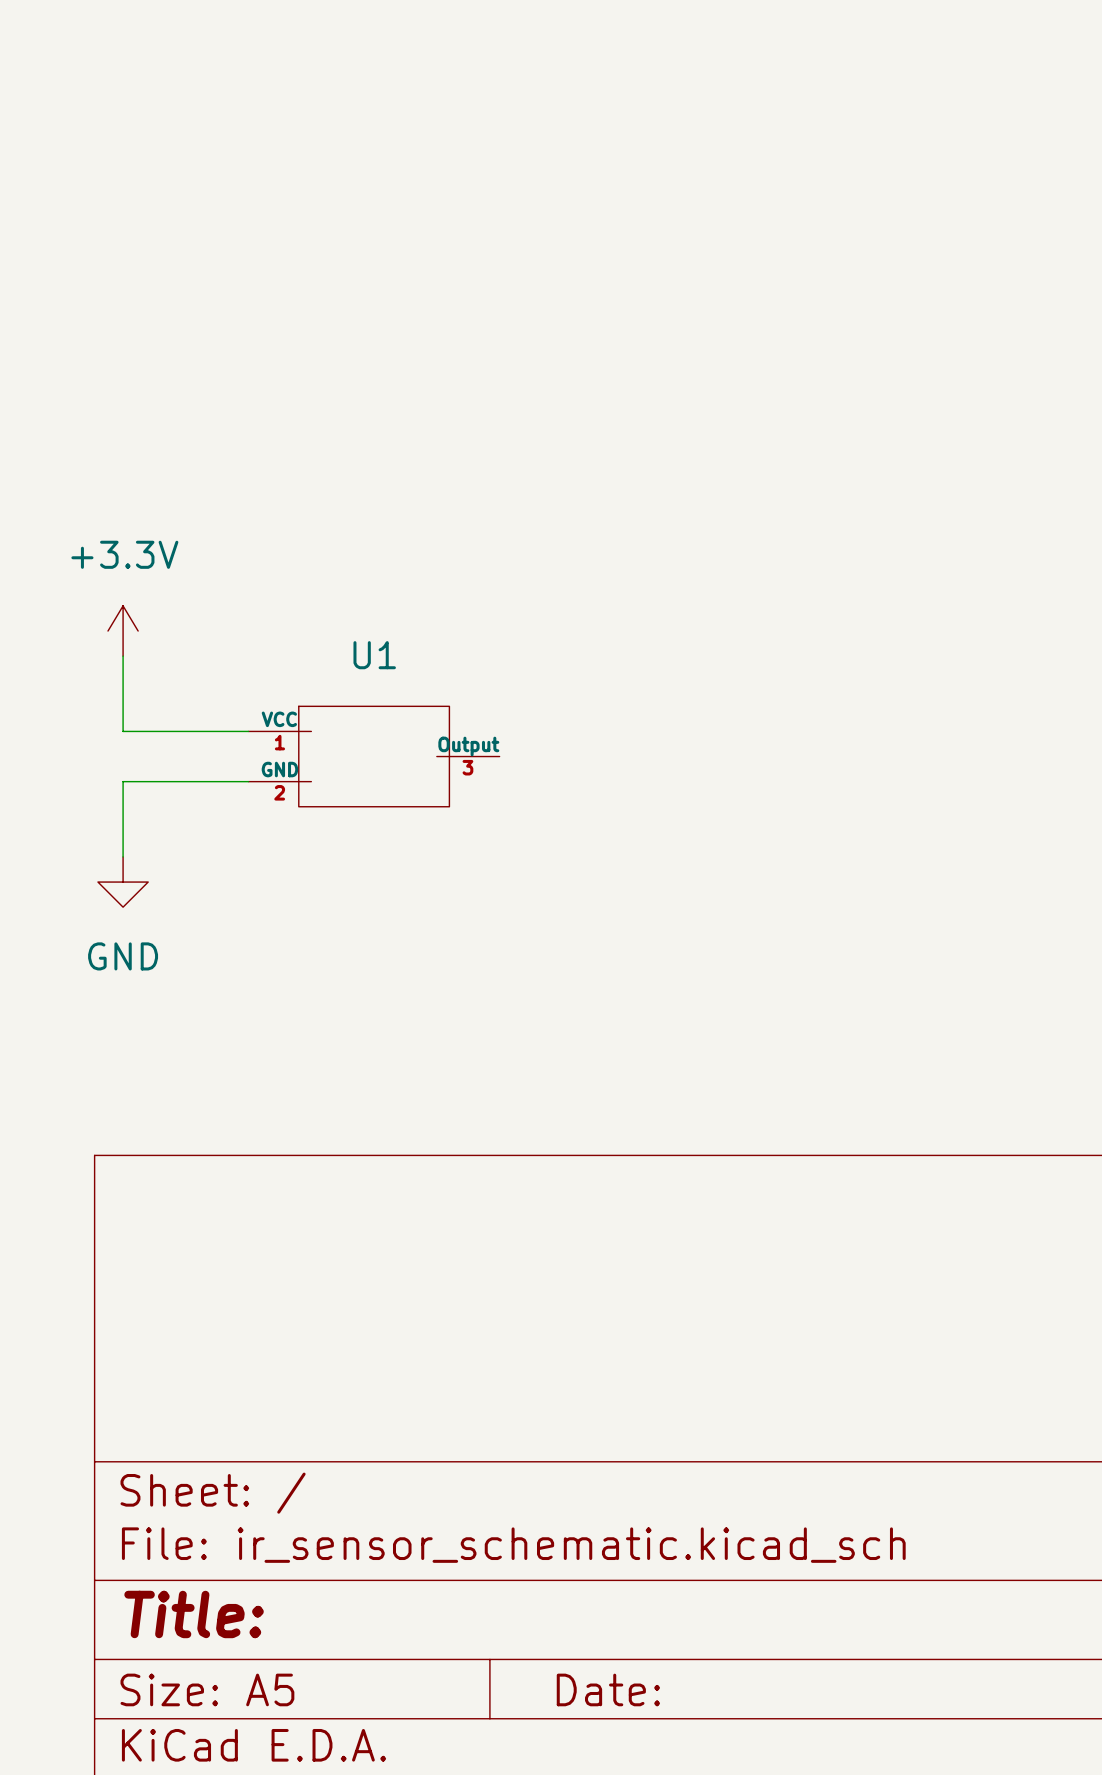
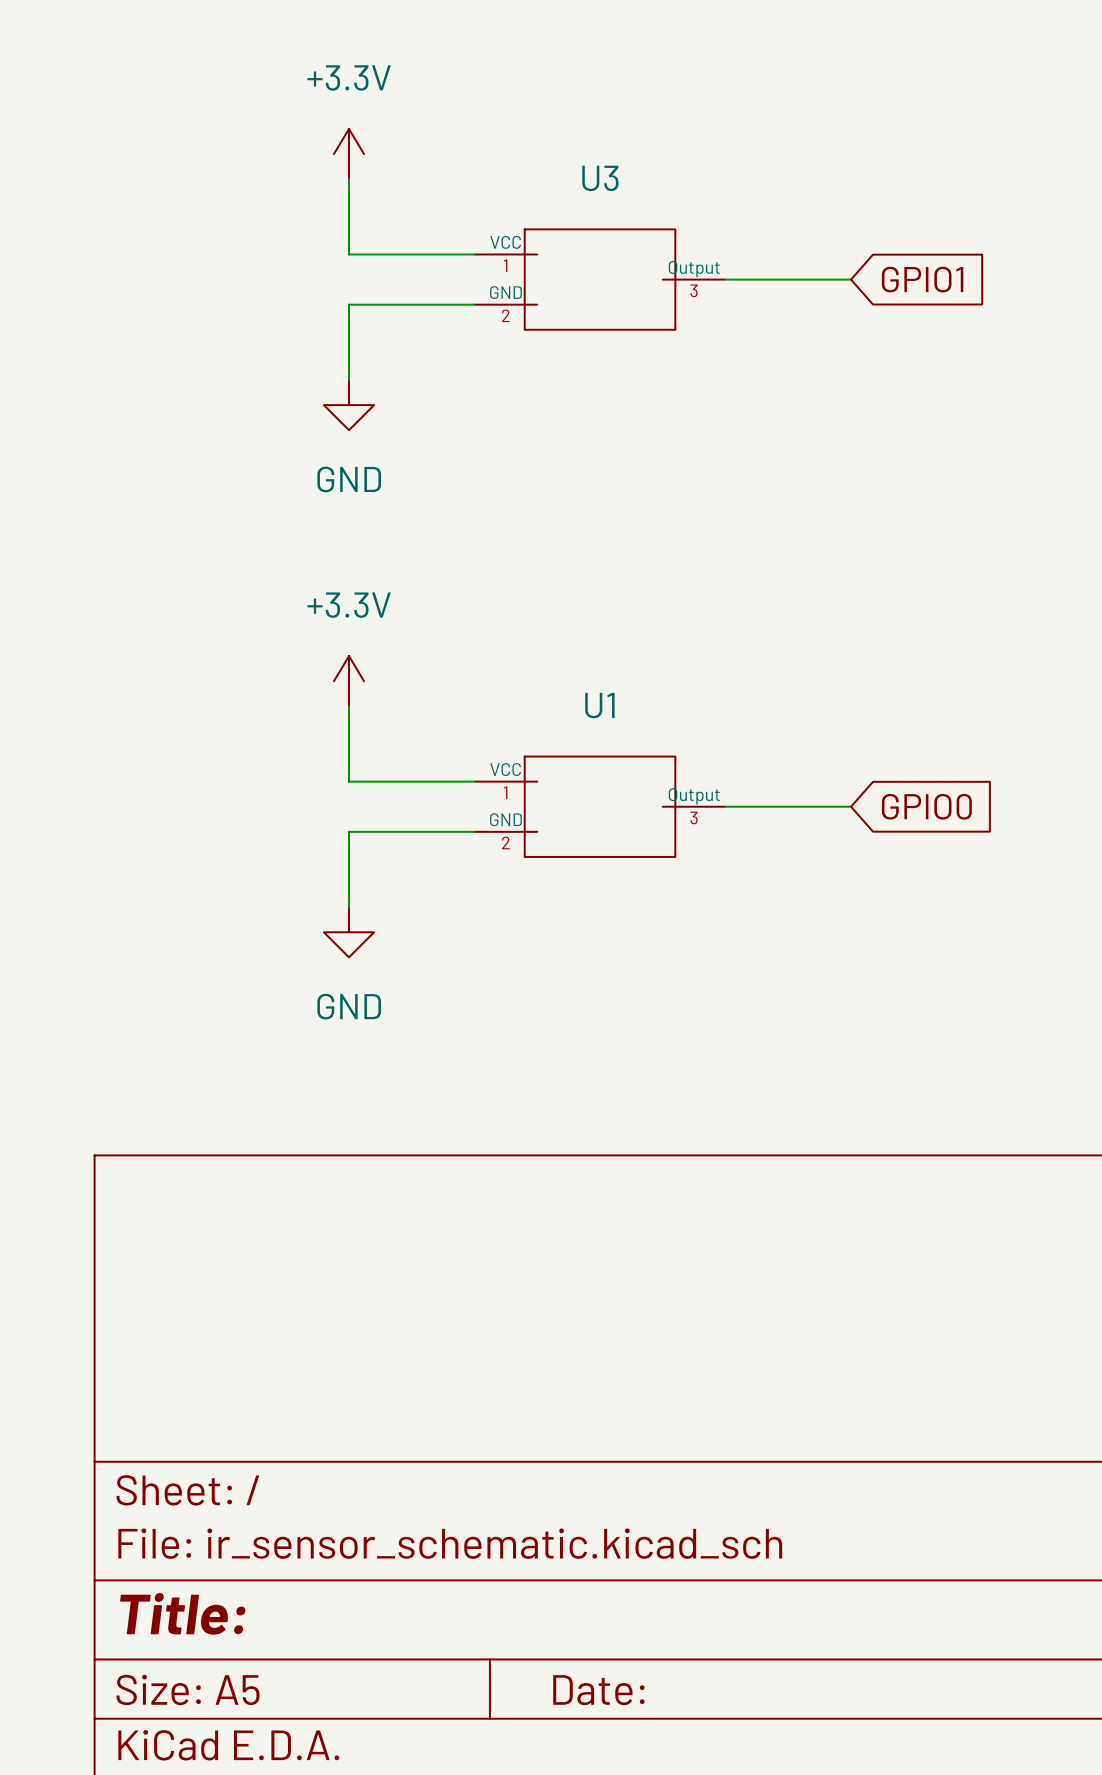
power symbol: none -> +3.3V (348, 154)
wire: none -> (348, 179) (348, 254) (474, 254)
U3: none -> (600, 279)
wire: none -> (725, 279) (851, 279)
global label: none -> GPIO1 (922, 279)
wire: none -> (474, 304) (348, 304) (348, 380)
power symbol: none -> GND (348, 405)
power symbol position: +3.3V (123, 631) -> +3.3V (348, 681)
wire: (123, 656) (123, 731) (248, 731) -> (348, 706) (348, 781) (474, 781)
U1 position: (374, 756) -> (600, 806)
wire: (248, 781) (123, 781) (123, 856) -> (474, 831) (348, 831) (348, 907)
wire: none -> (725, 806) (851, 806)
global label: none -> GPIO0 (926, 806)
power symbol position: GND (123, 882) -> GND (348, 932)

